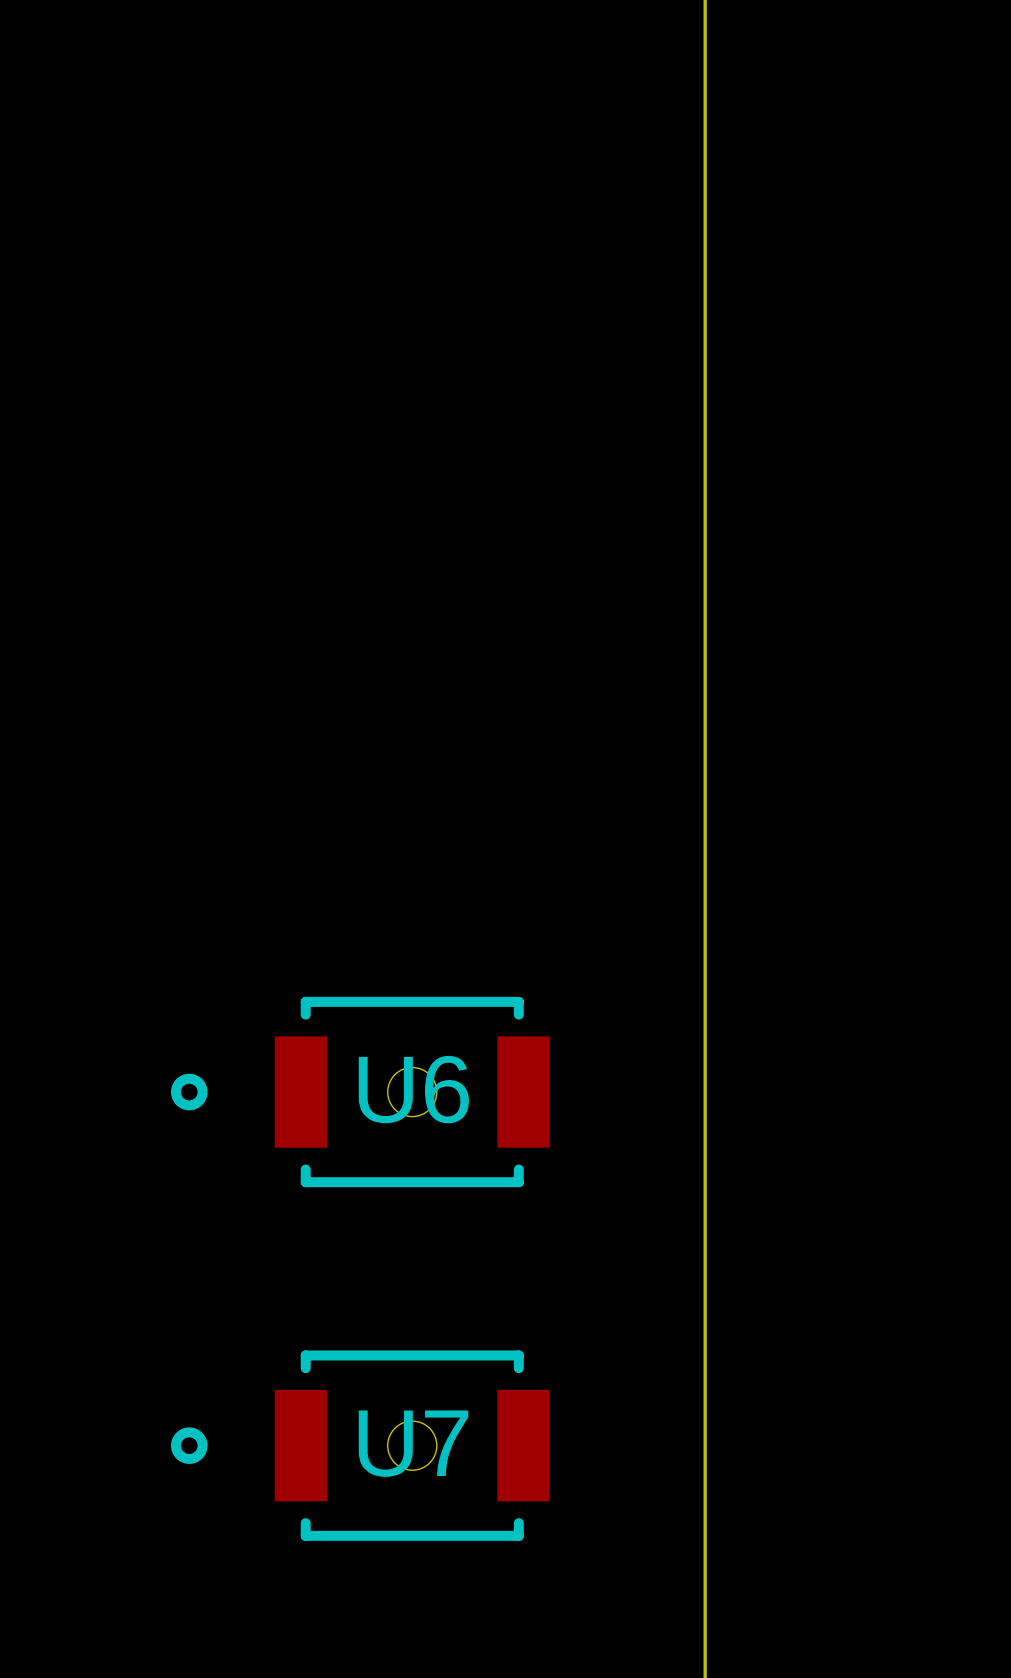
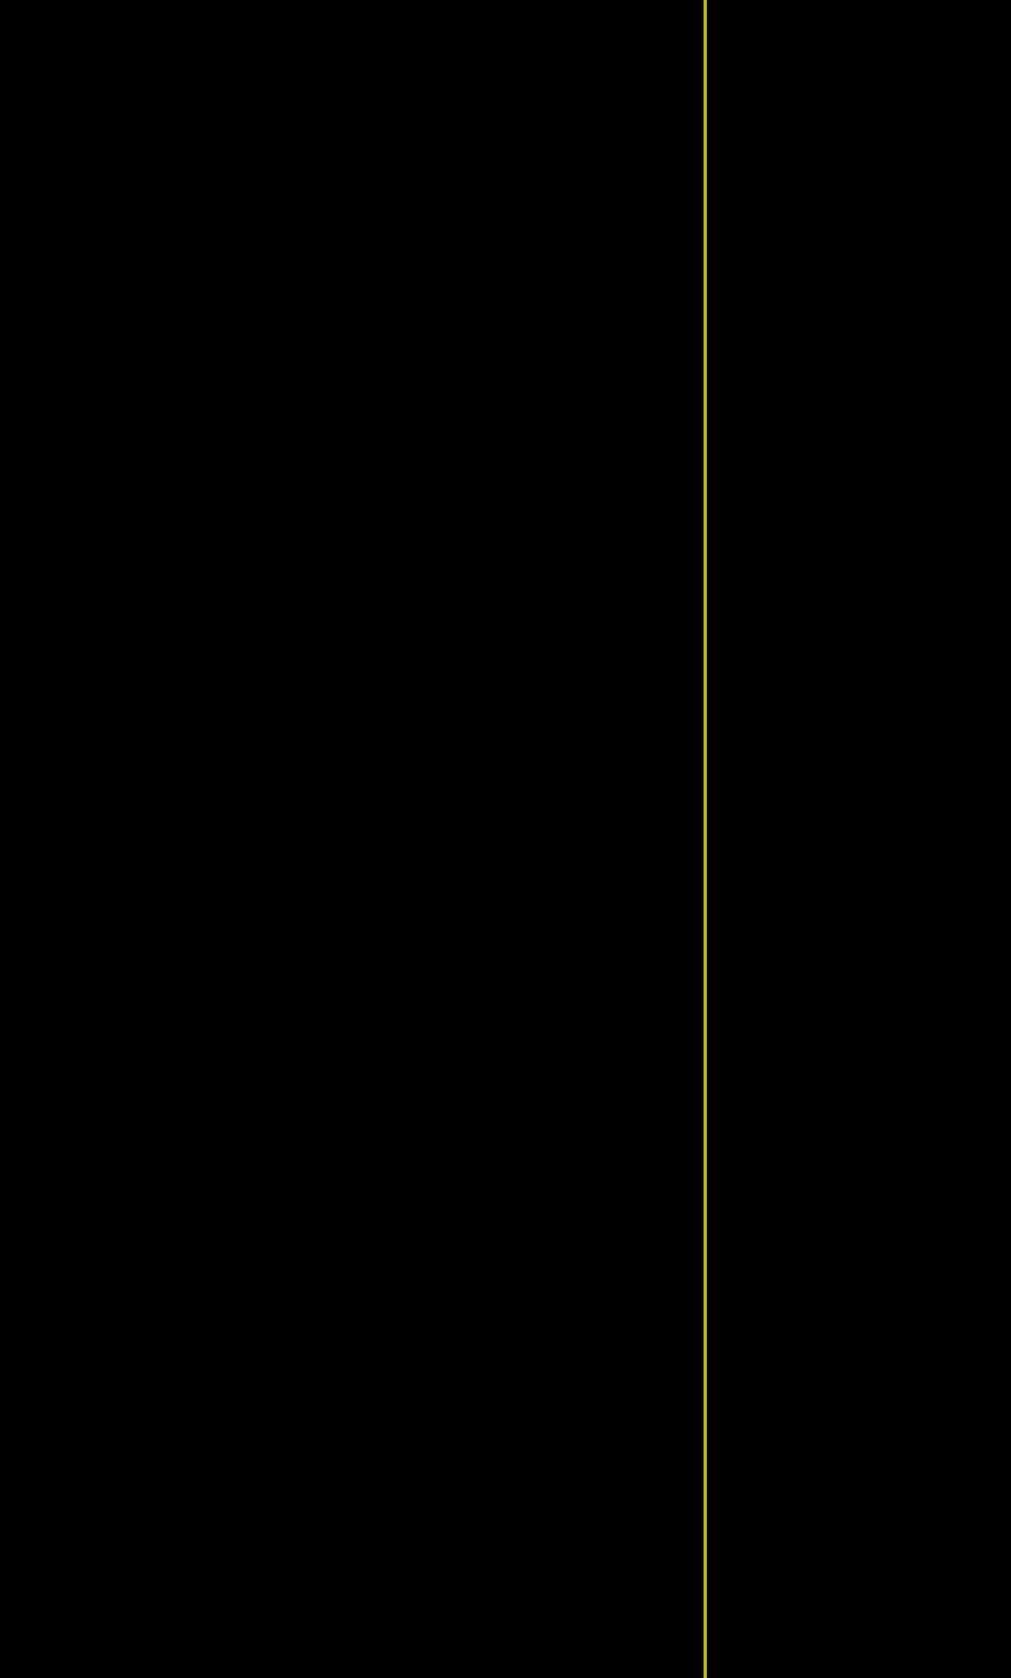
U6: (360, 1092) -> none
U7: (360, 1445) -> none

